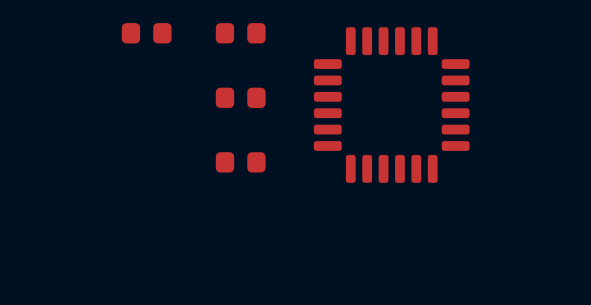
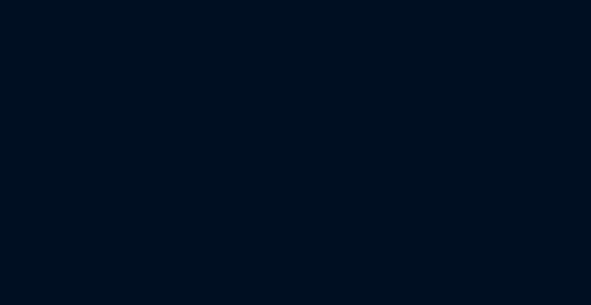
part: (146, 33) -> none
part: (240, 33) -> none
part: (240, 97) -> none
part: (391, 105) -> none
part: (240, 162) -> none

